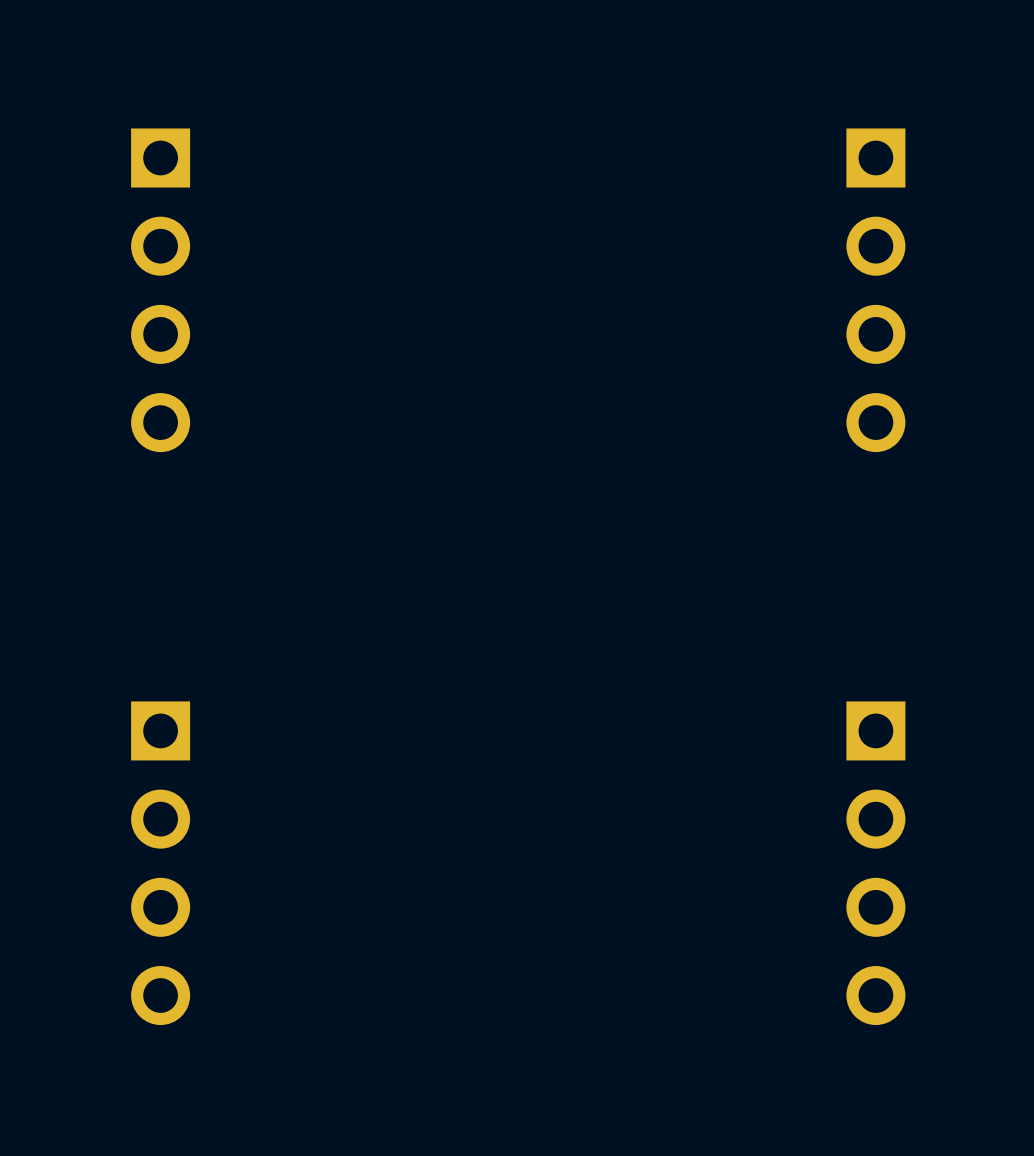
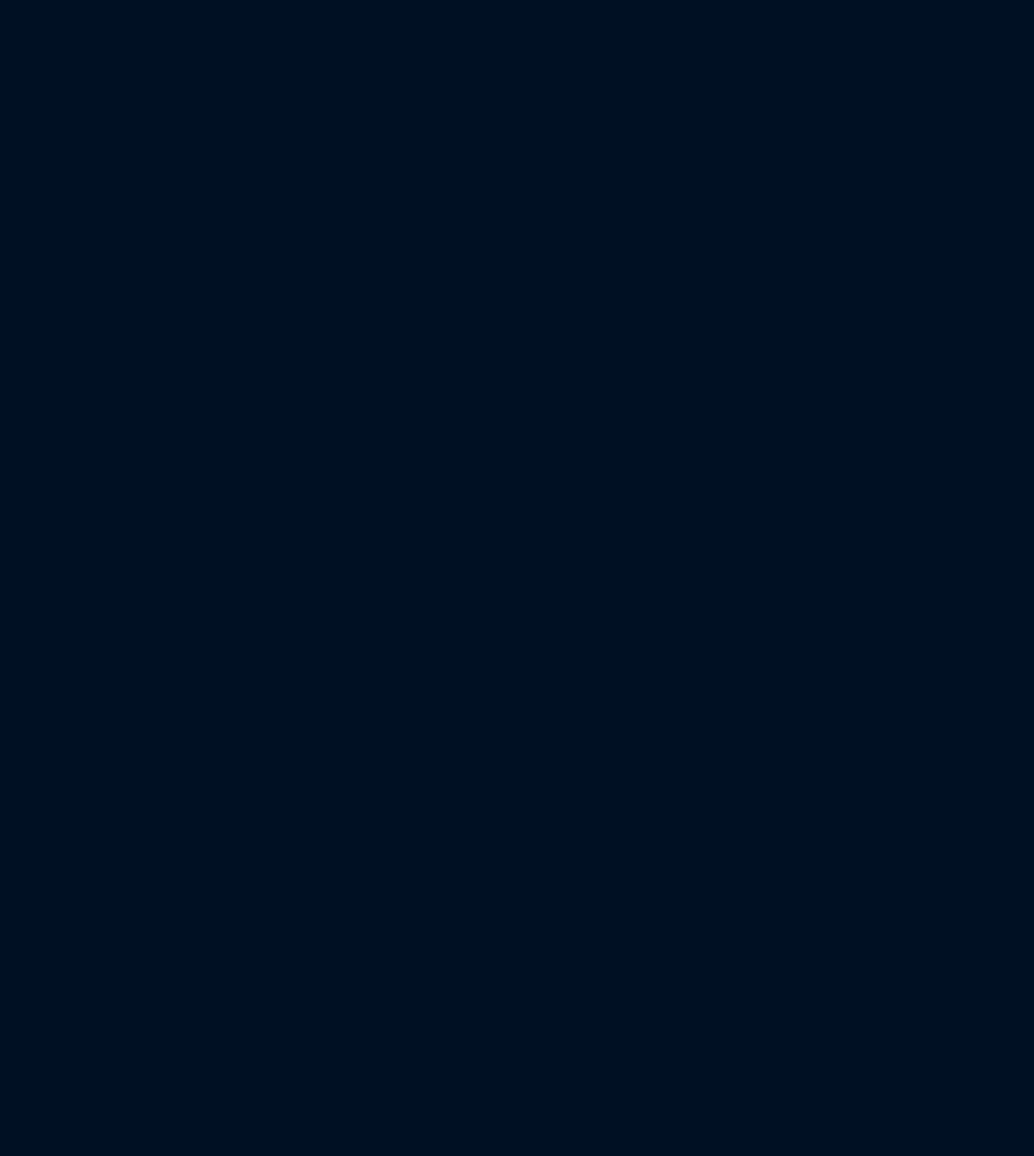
part: (160, 290) -> none
part: (875, 290) -> none
part: (160, 863) -> none
part: (875, 863) -> none

